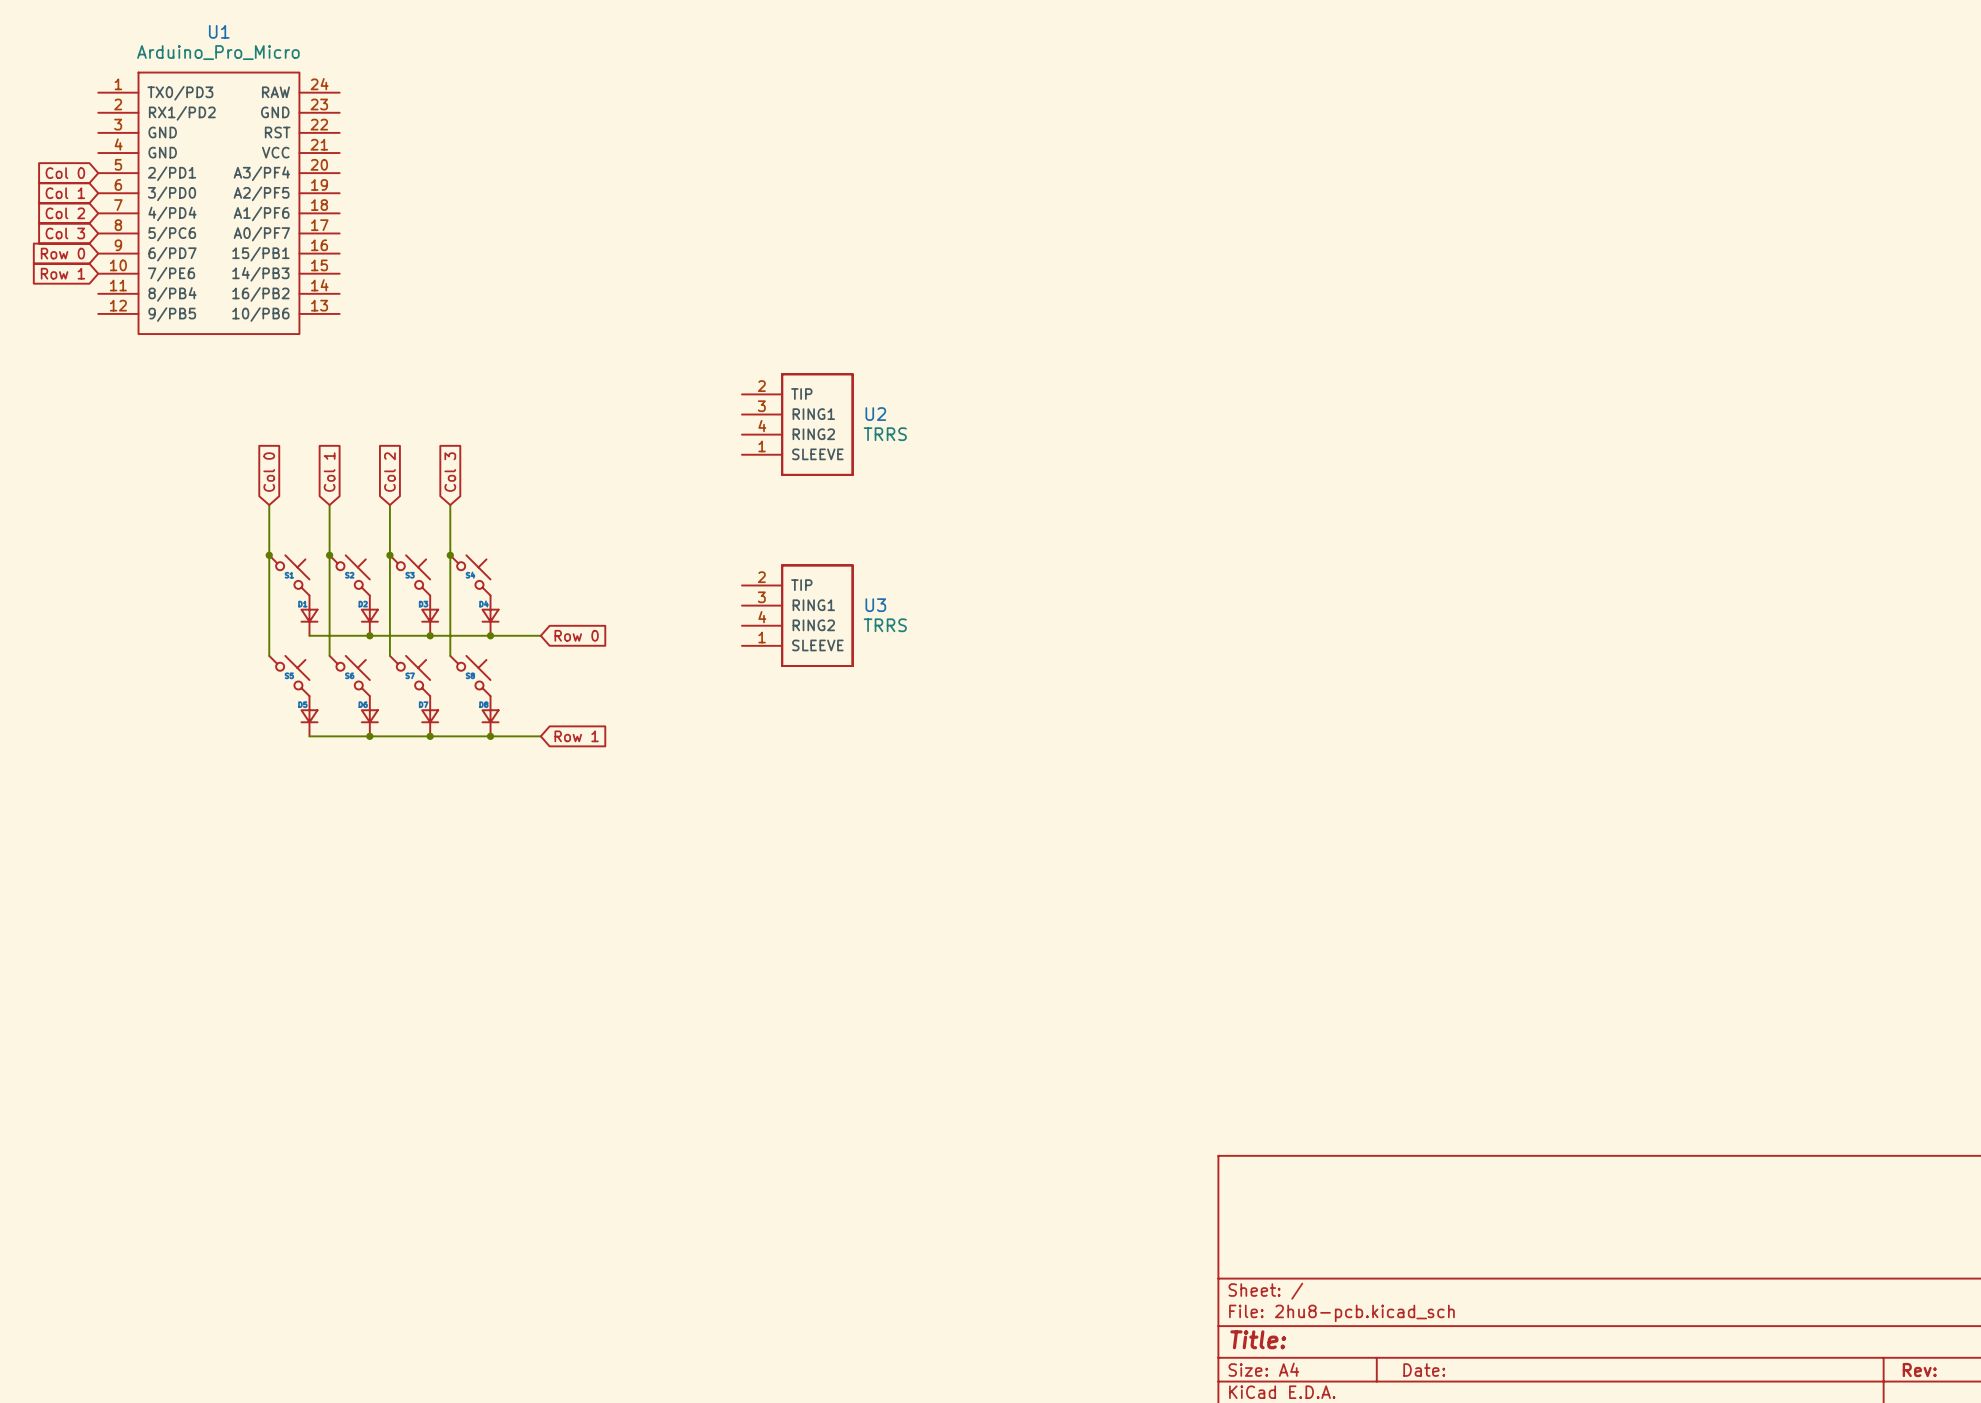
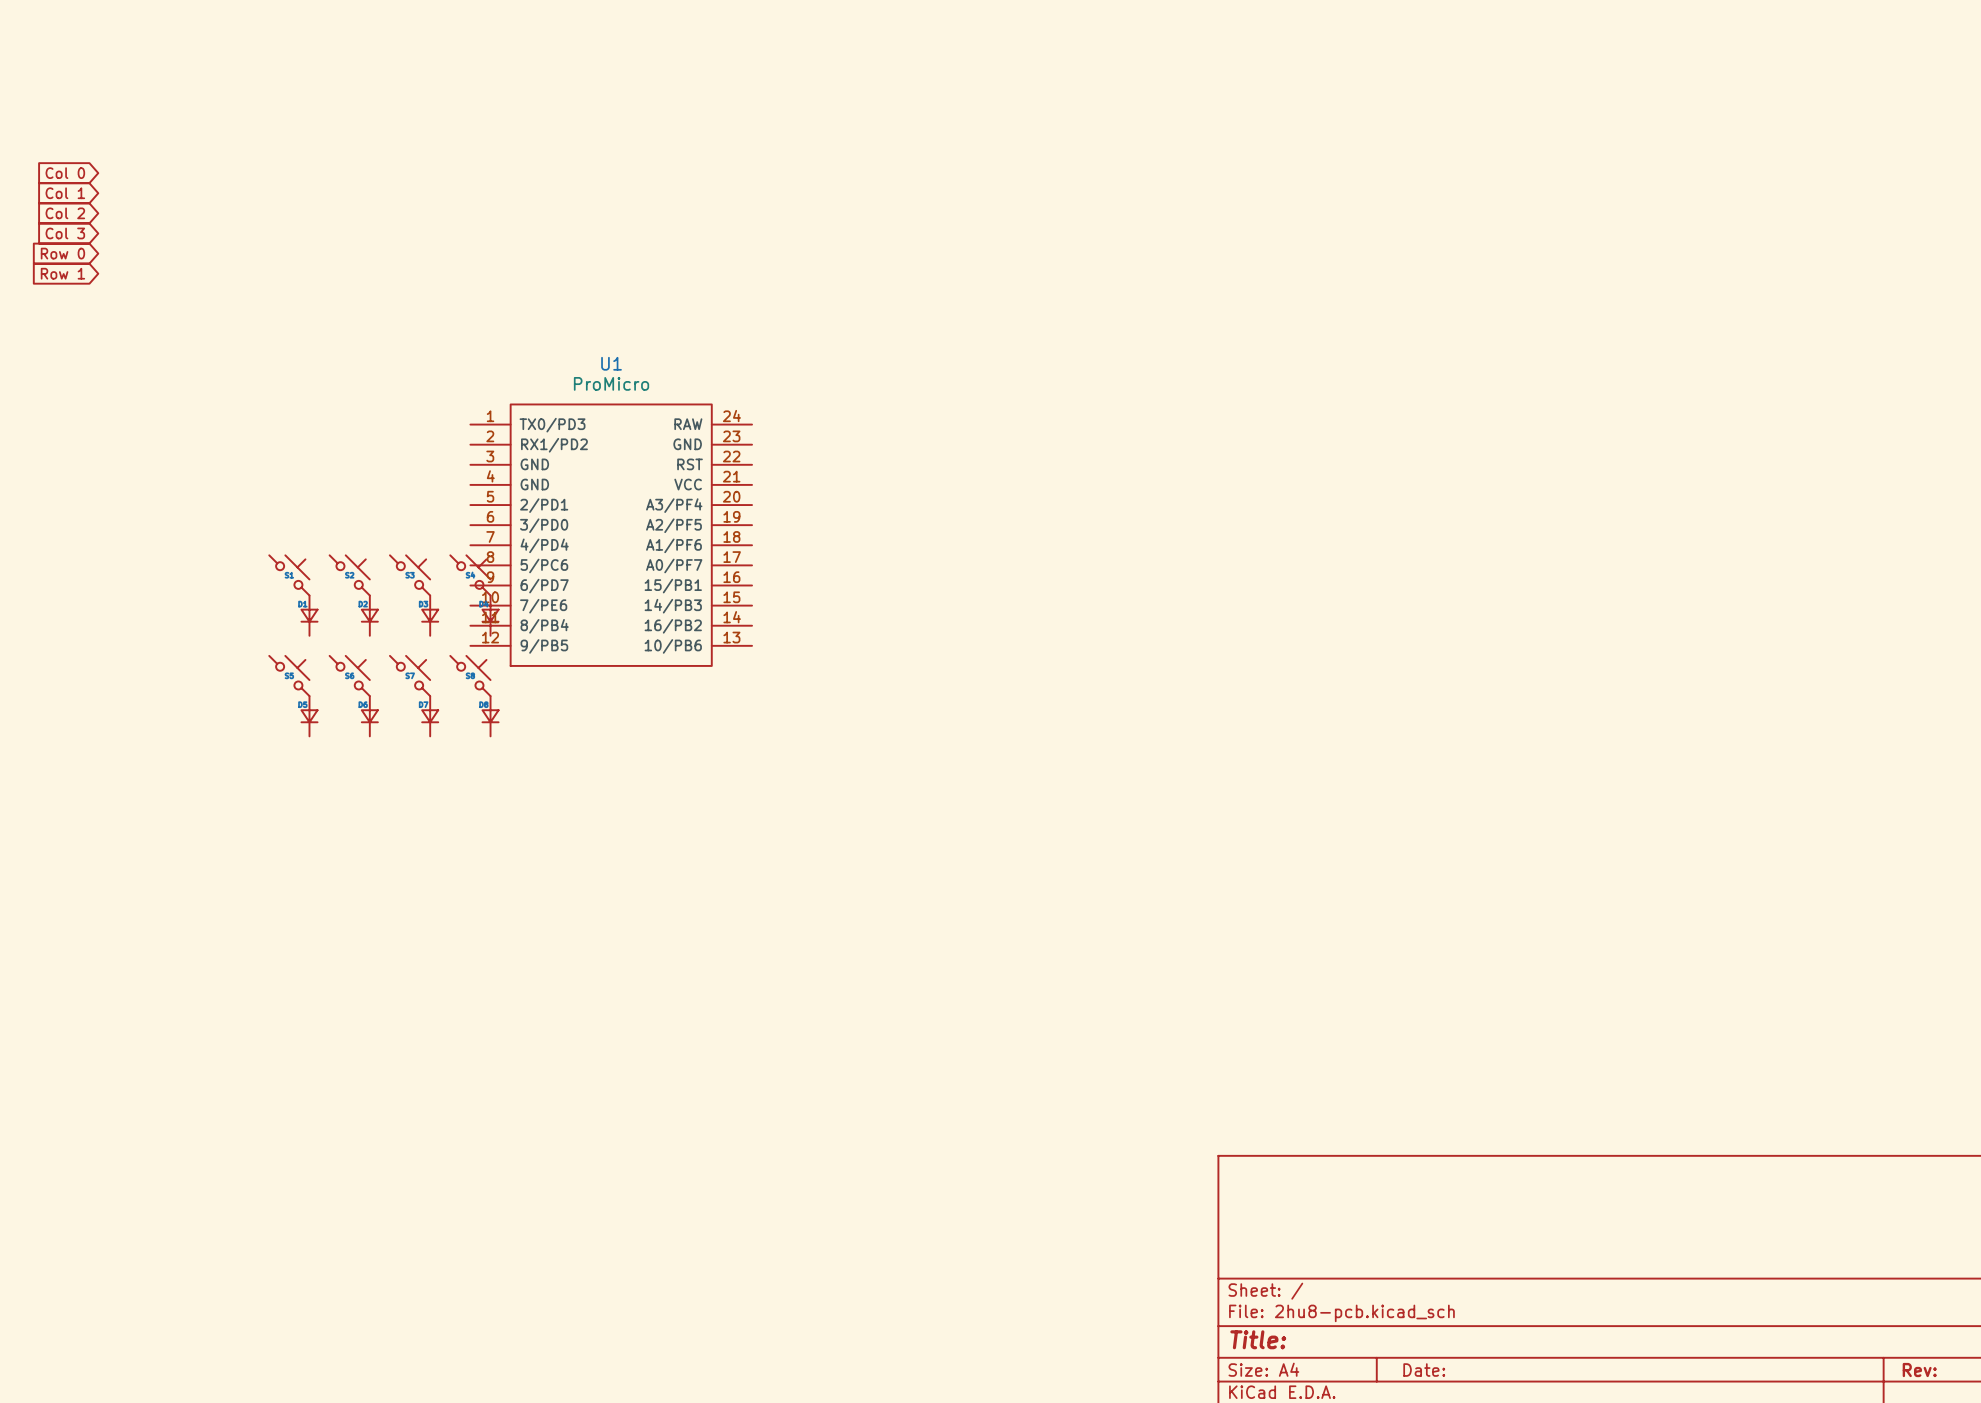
U1 value: Arduino_Pro_Micro (218, 52) -> ProMicro (611, 383)
U1 symbol: [98, 72, 340, 335] -> [470, 404, 753, 666]
U2: TRRS (797, 424) -> none
global label: Col 0 (269, 472) -> none
global label: Col 1 (329, 472) -> none
global label: Col 2 (389, 472) -> none
global label: Col 3 (450, 472) -> none
wire: (269, 505) (269, 655) -> none
wire: (329, 505) (329, 655) -> none
wire: (389, 505) (389, 655) -> none
wire: (450, 505) (450, 655) -> none
junction: (269, 555) -> none
junction: (329, 555) -> none
junction: (389, 555) -> none
junction: (450, 555) -> none
U3: TRRS (797, 615) -> none
wire: (309, 635) (540, 635) -> none
junction: (369, 635) -> none
junction: (430, 635) -> none
junction: (490, 635) -> none
global label: Row 0 (576, 635) -> none
wire: (309, 736) (540, 736) -> none
junction: (369, 736) -> none
junction: (430, 736) -> none
junction: (490, 736) -> none
global label: Row 1 (576, 736) -> none

